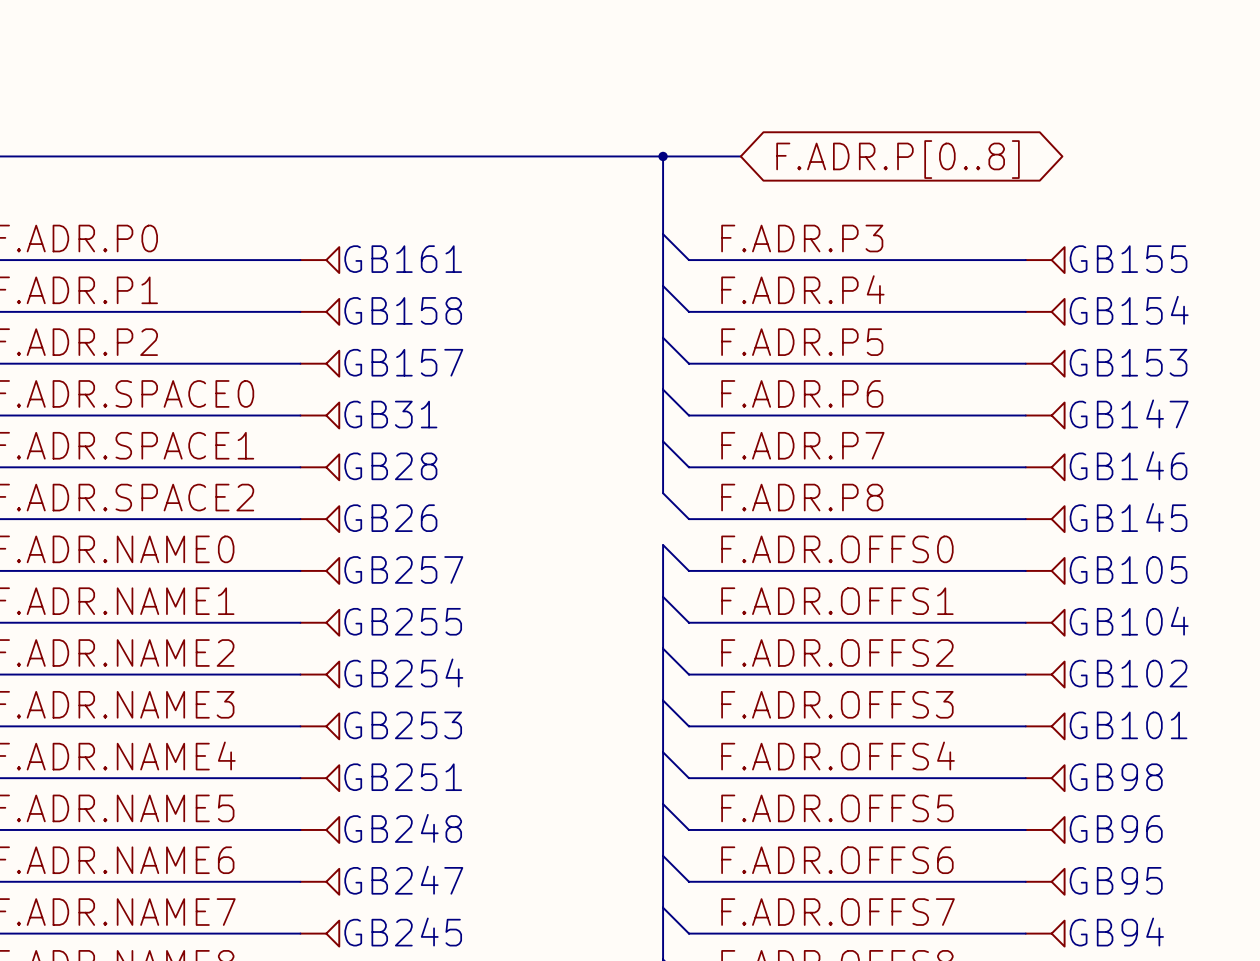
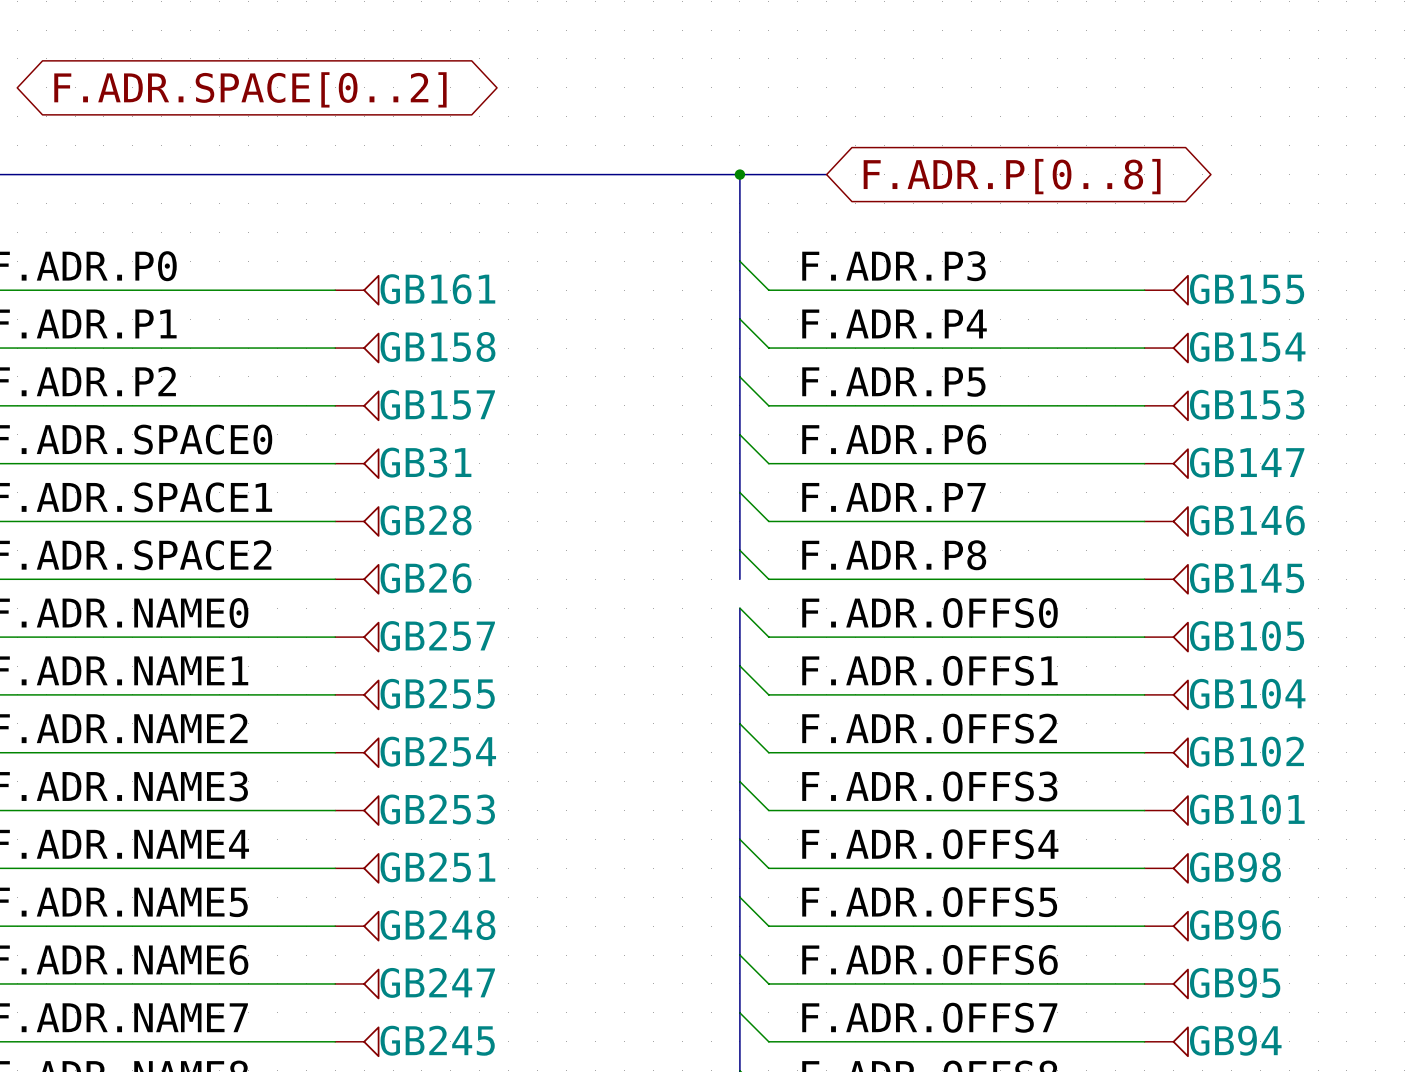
global label: none -> F.ADR.SPACE[0..2] (250, 89)
bus: none -> (739, 550) (739, 579)

